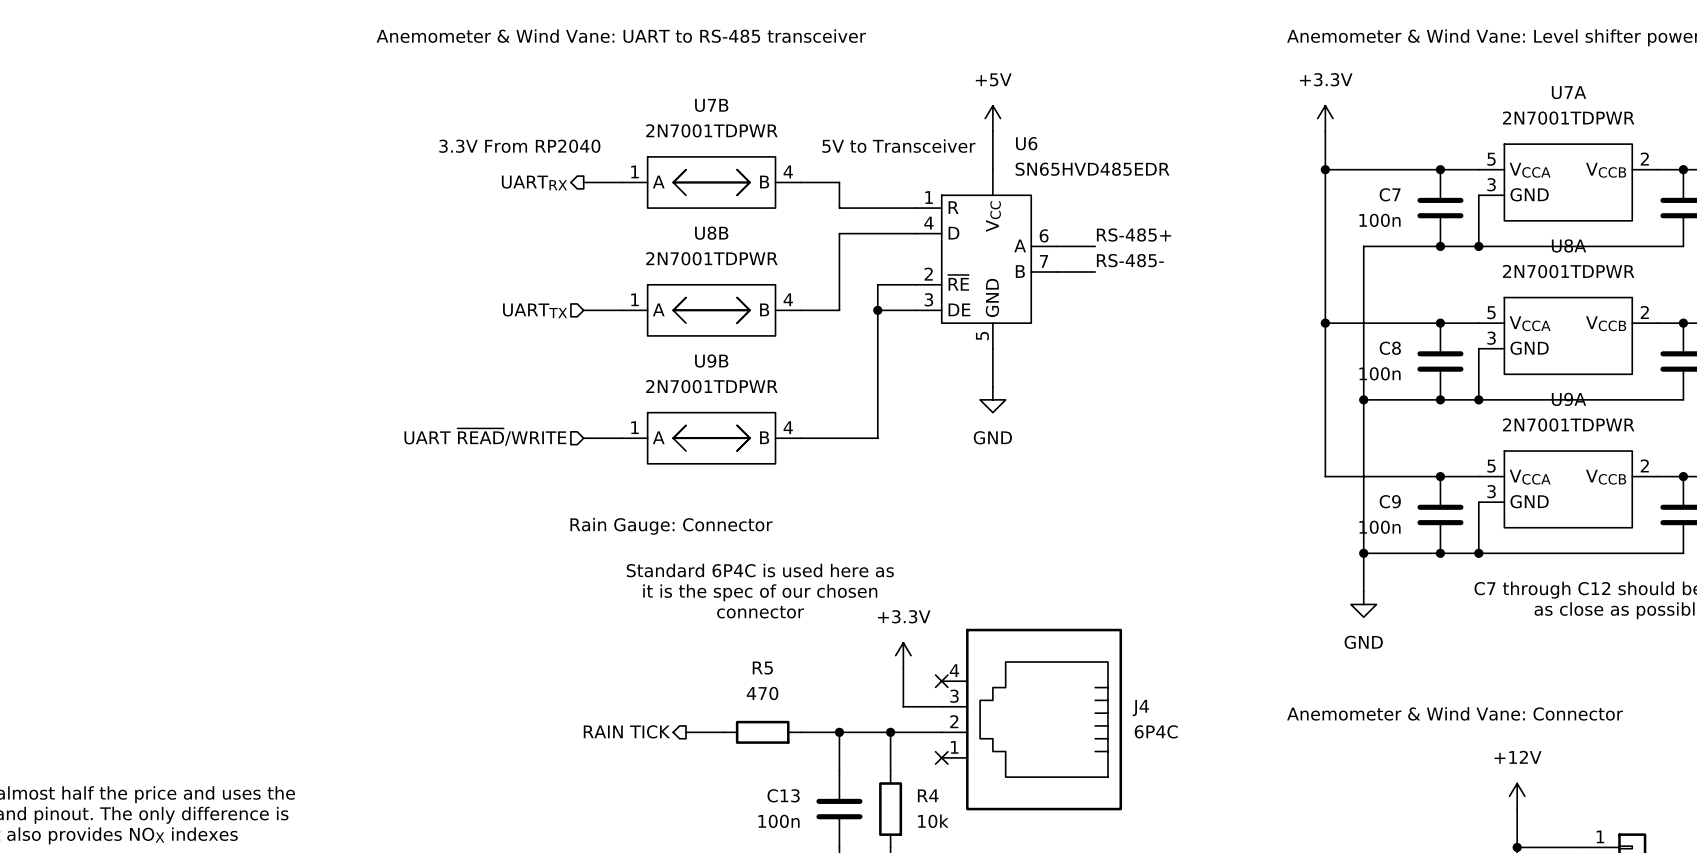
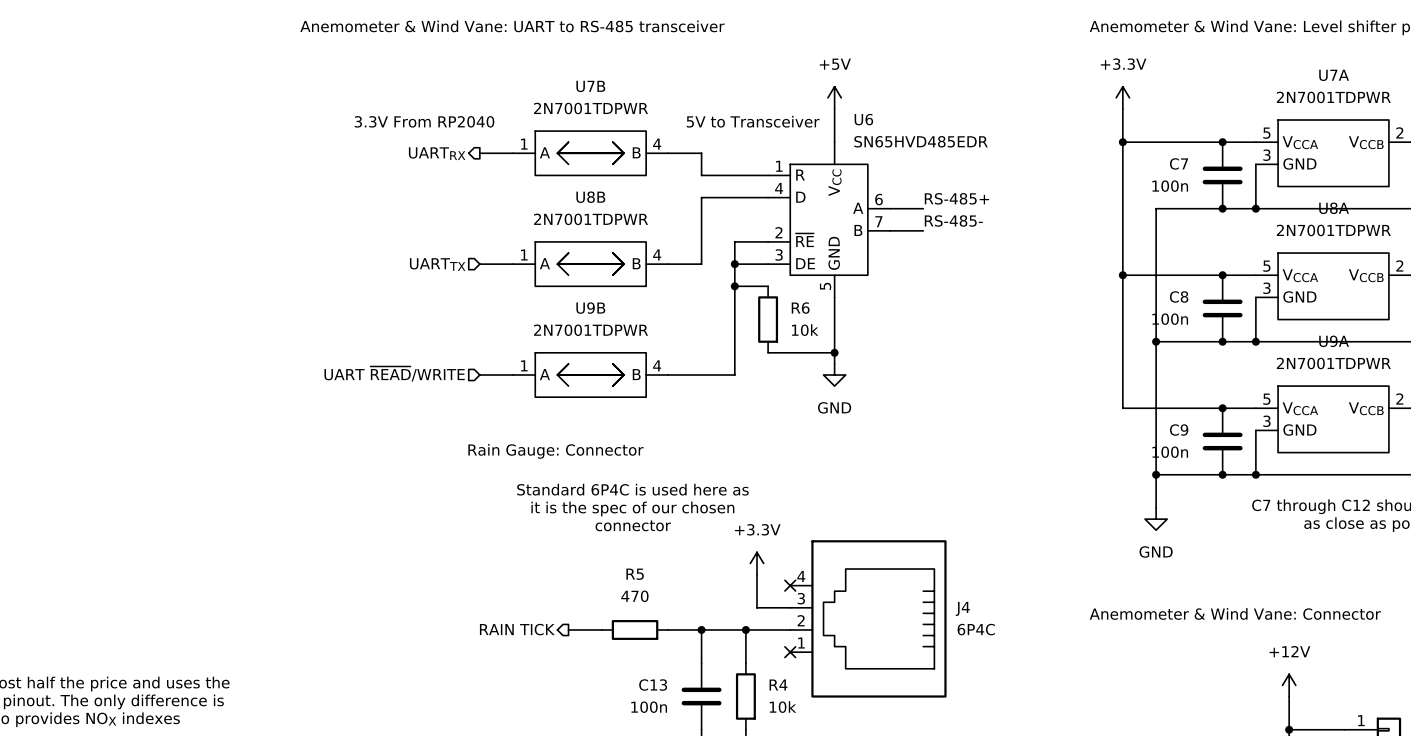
wire: none -> (734, 286) (768, 286)
junction: none -> (734, 286)
R6: none -> 10k (768, 319)
wire: none -> (834, 330) (834, 363)
power symbol position: GND (992, 399) -> GND (834, 374)
wire: none -> (768, 352) (834, 352)
junction: none -> (834, 352)

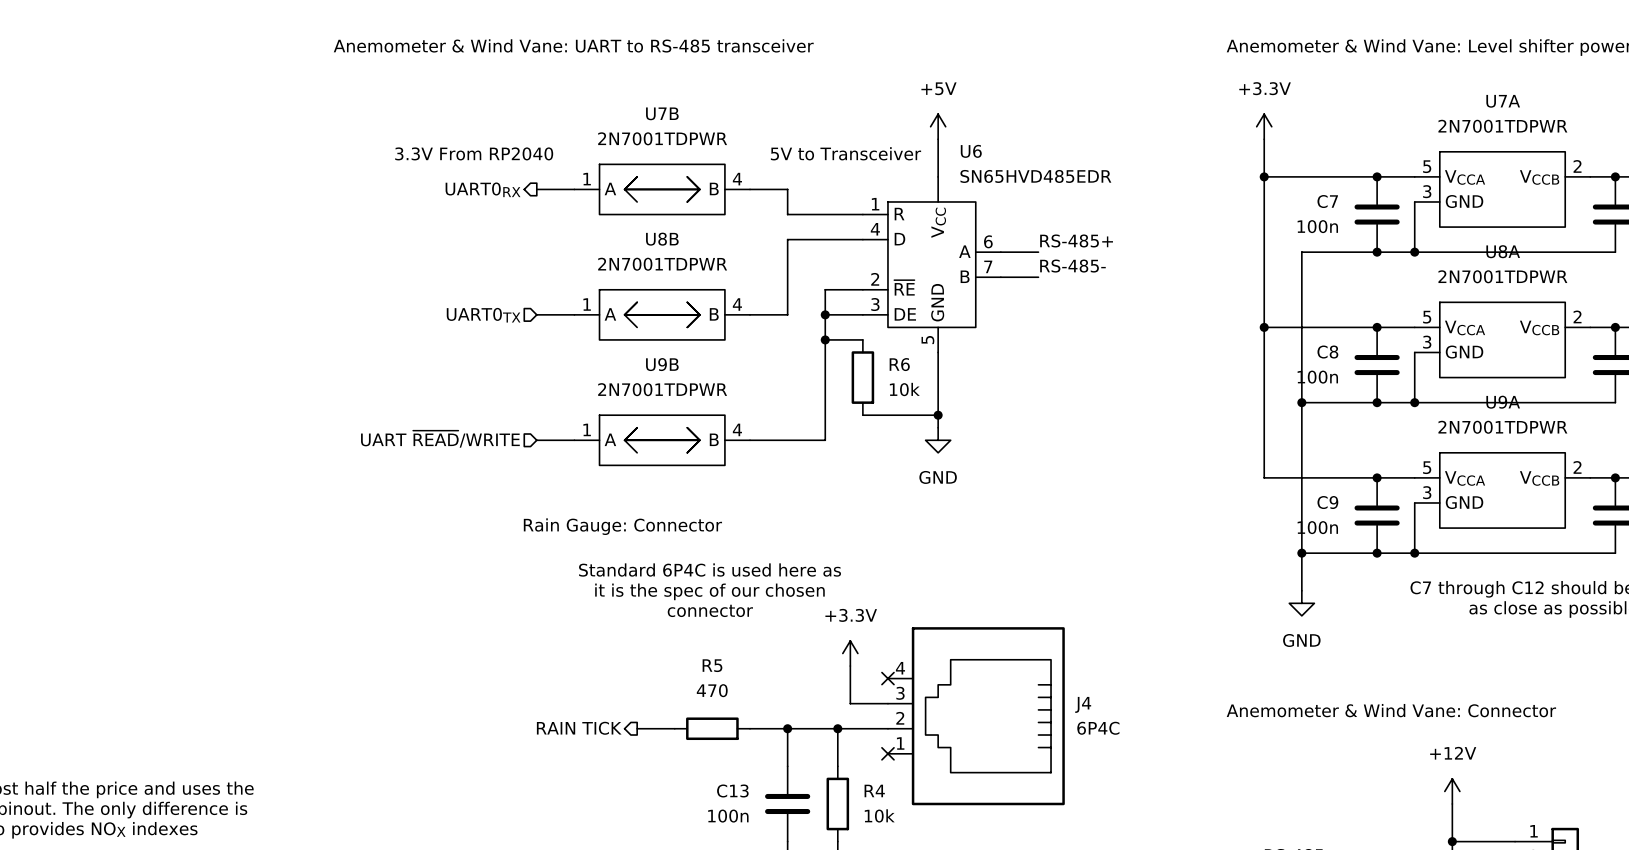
hierarchical label: UARTRX (437, 153) -> UART0RX (483, 189)
hierarchical label: UARTTX (437, 264) -> UART0TX (483, 315)

